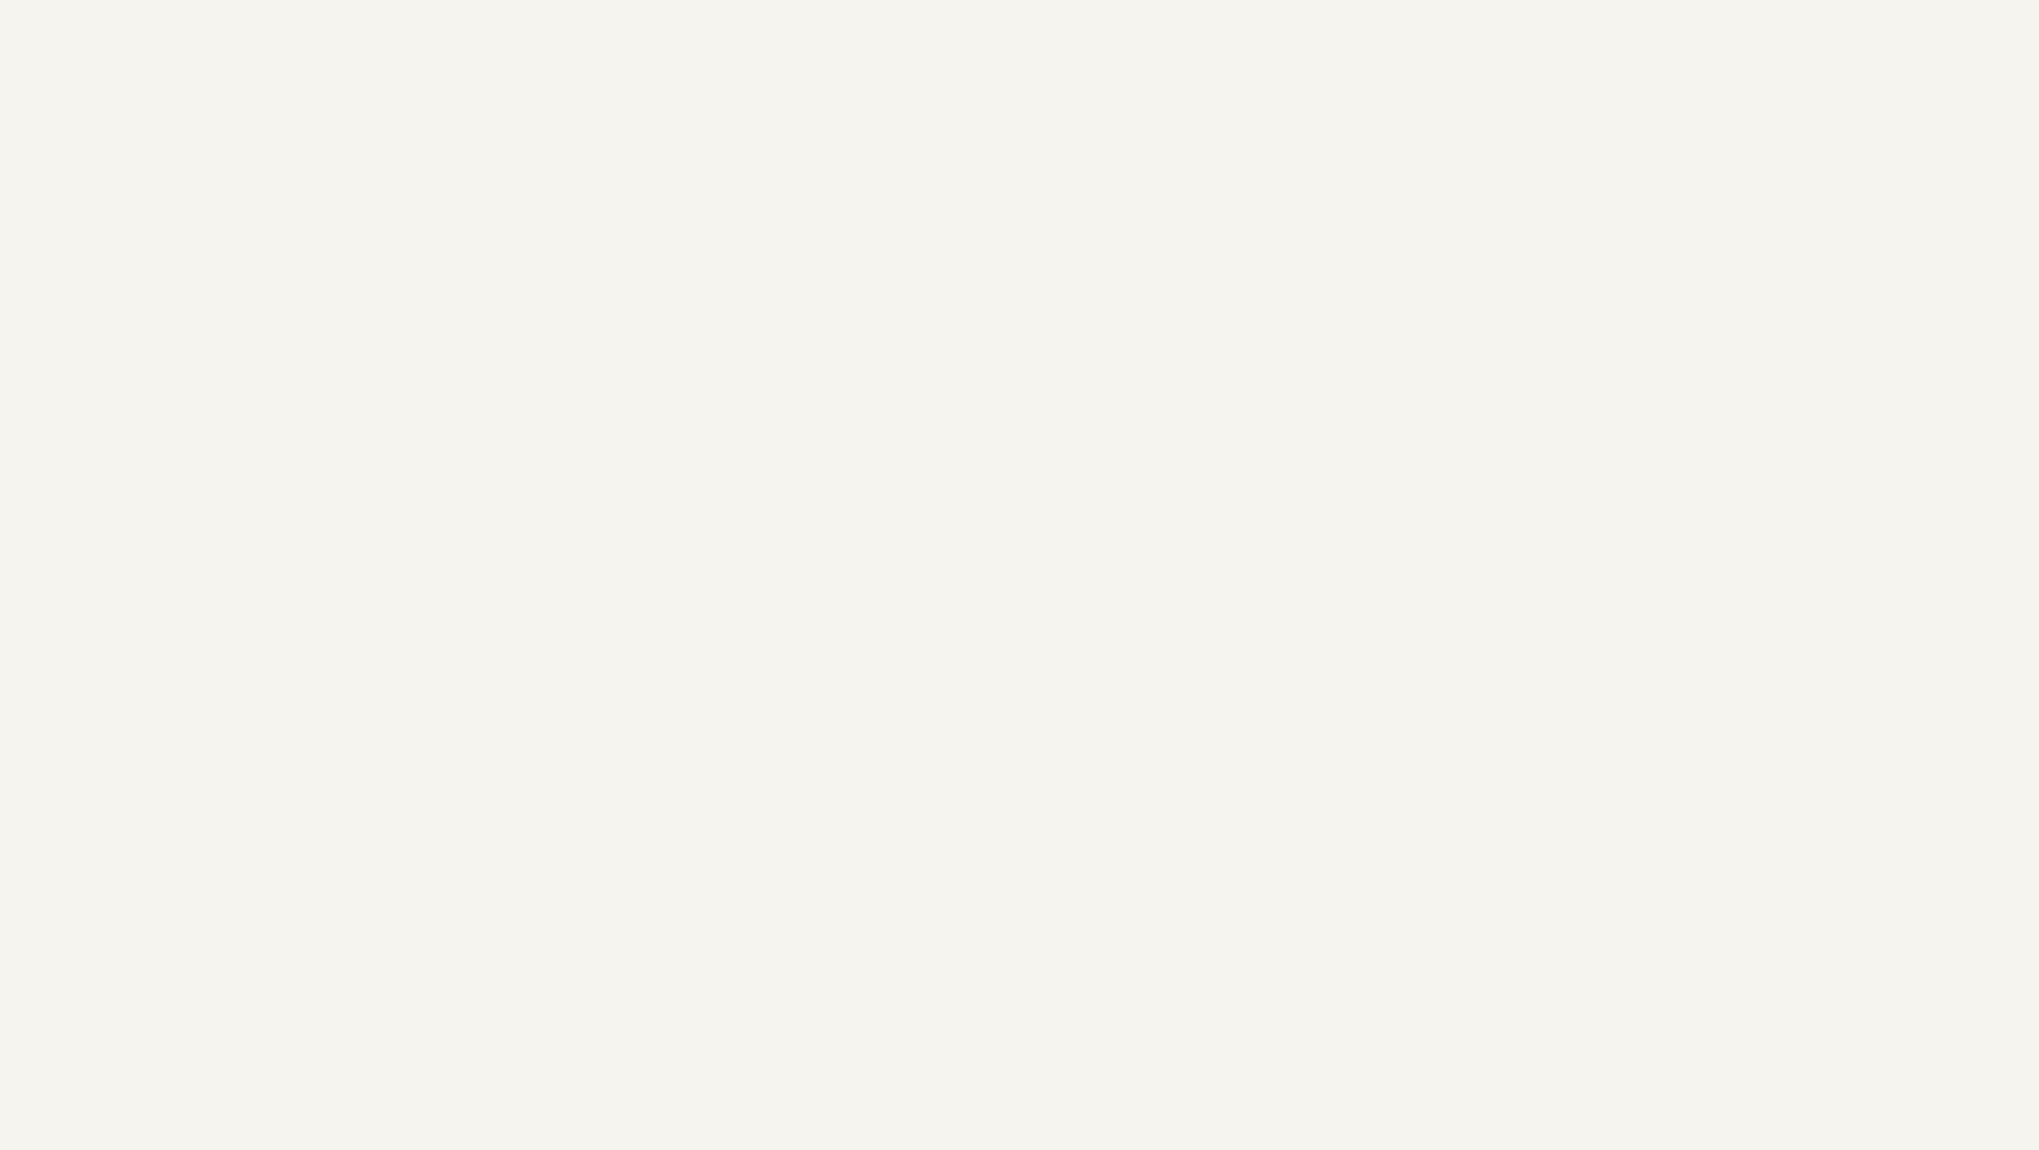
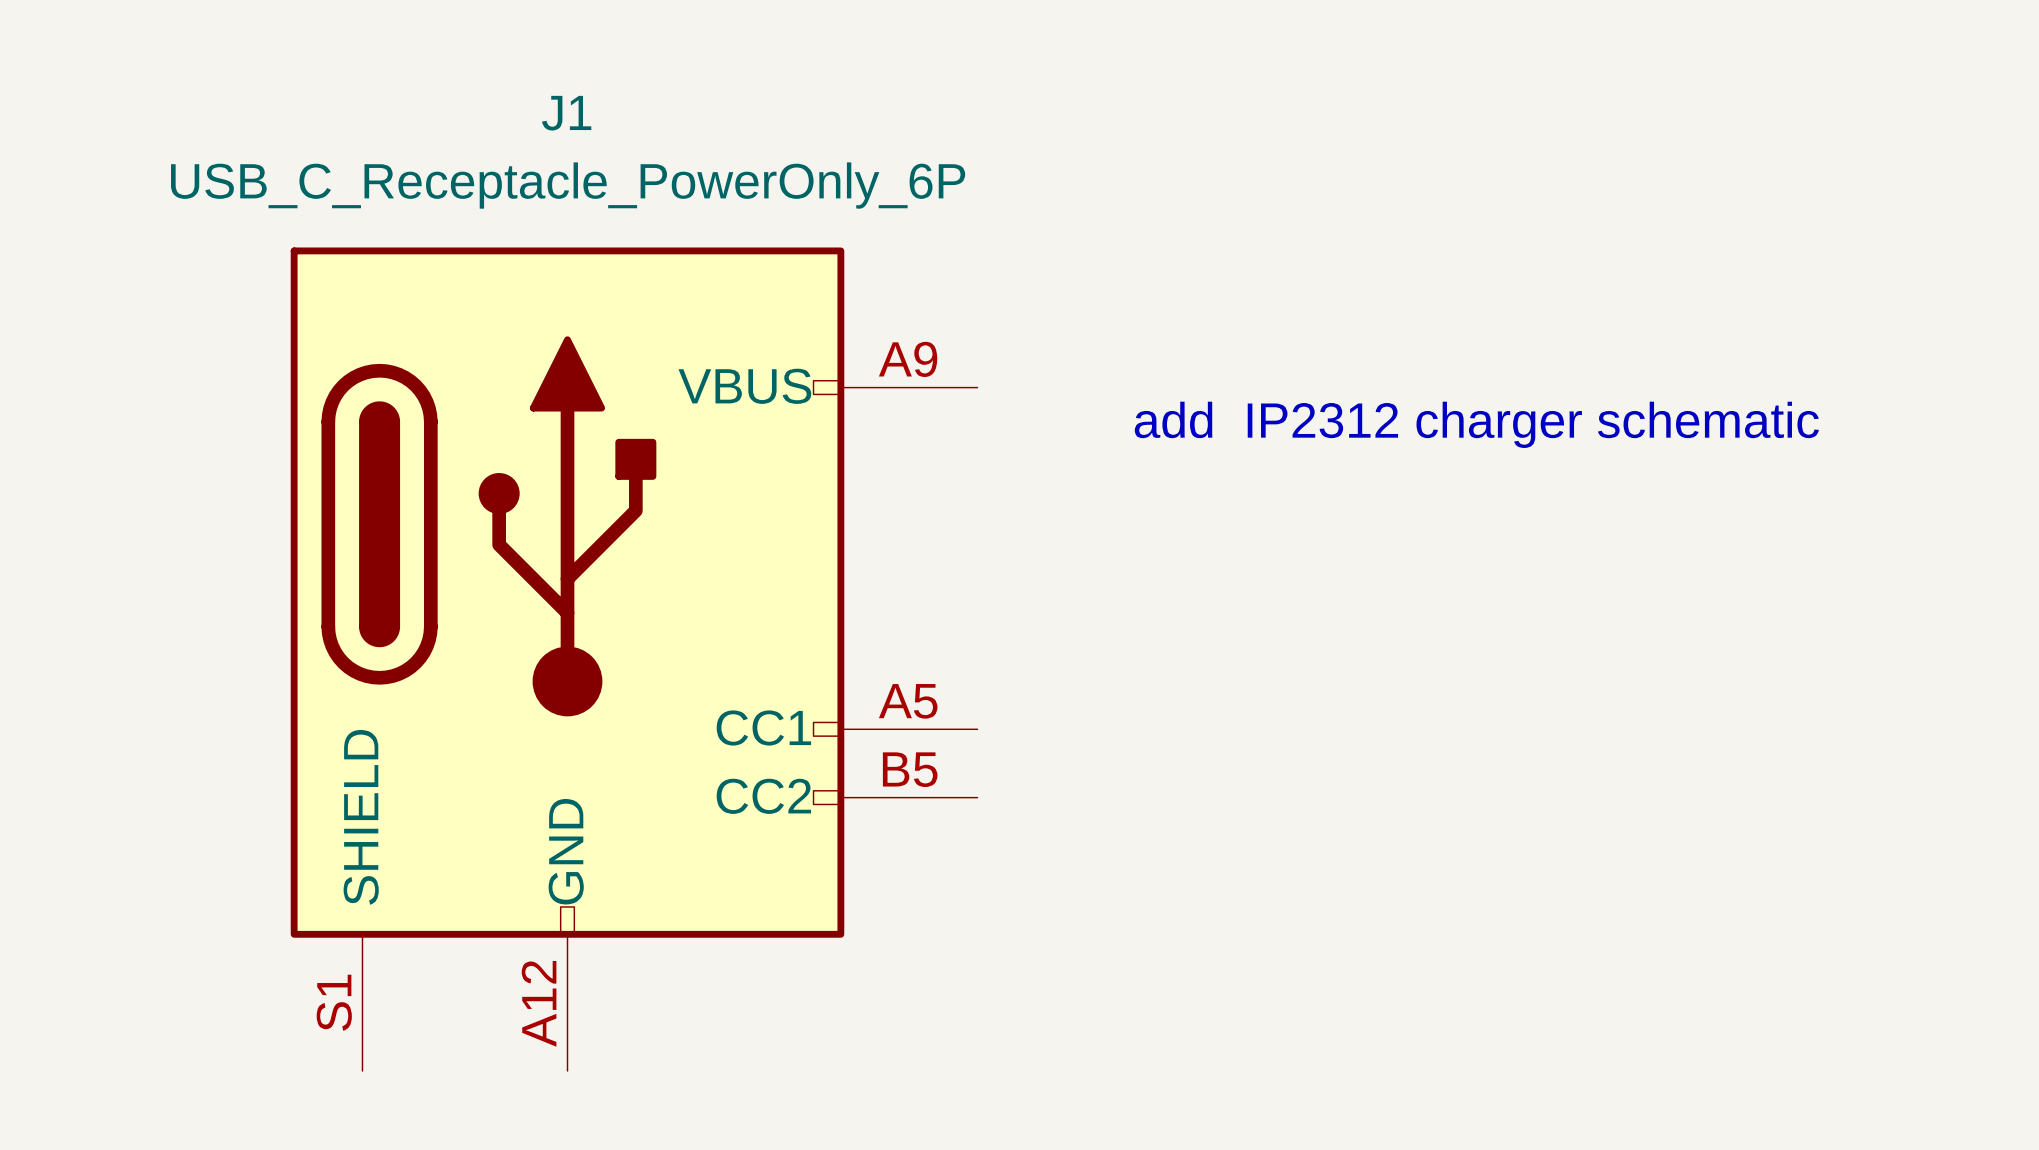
text: none -> add IP2312 charger schematic (1476, 424)
J1: none -> USB_C_Receptacle_PowerOnly_6P (634, 659)

